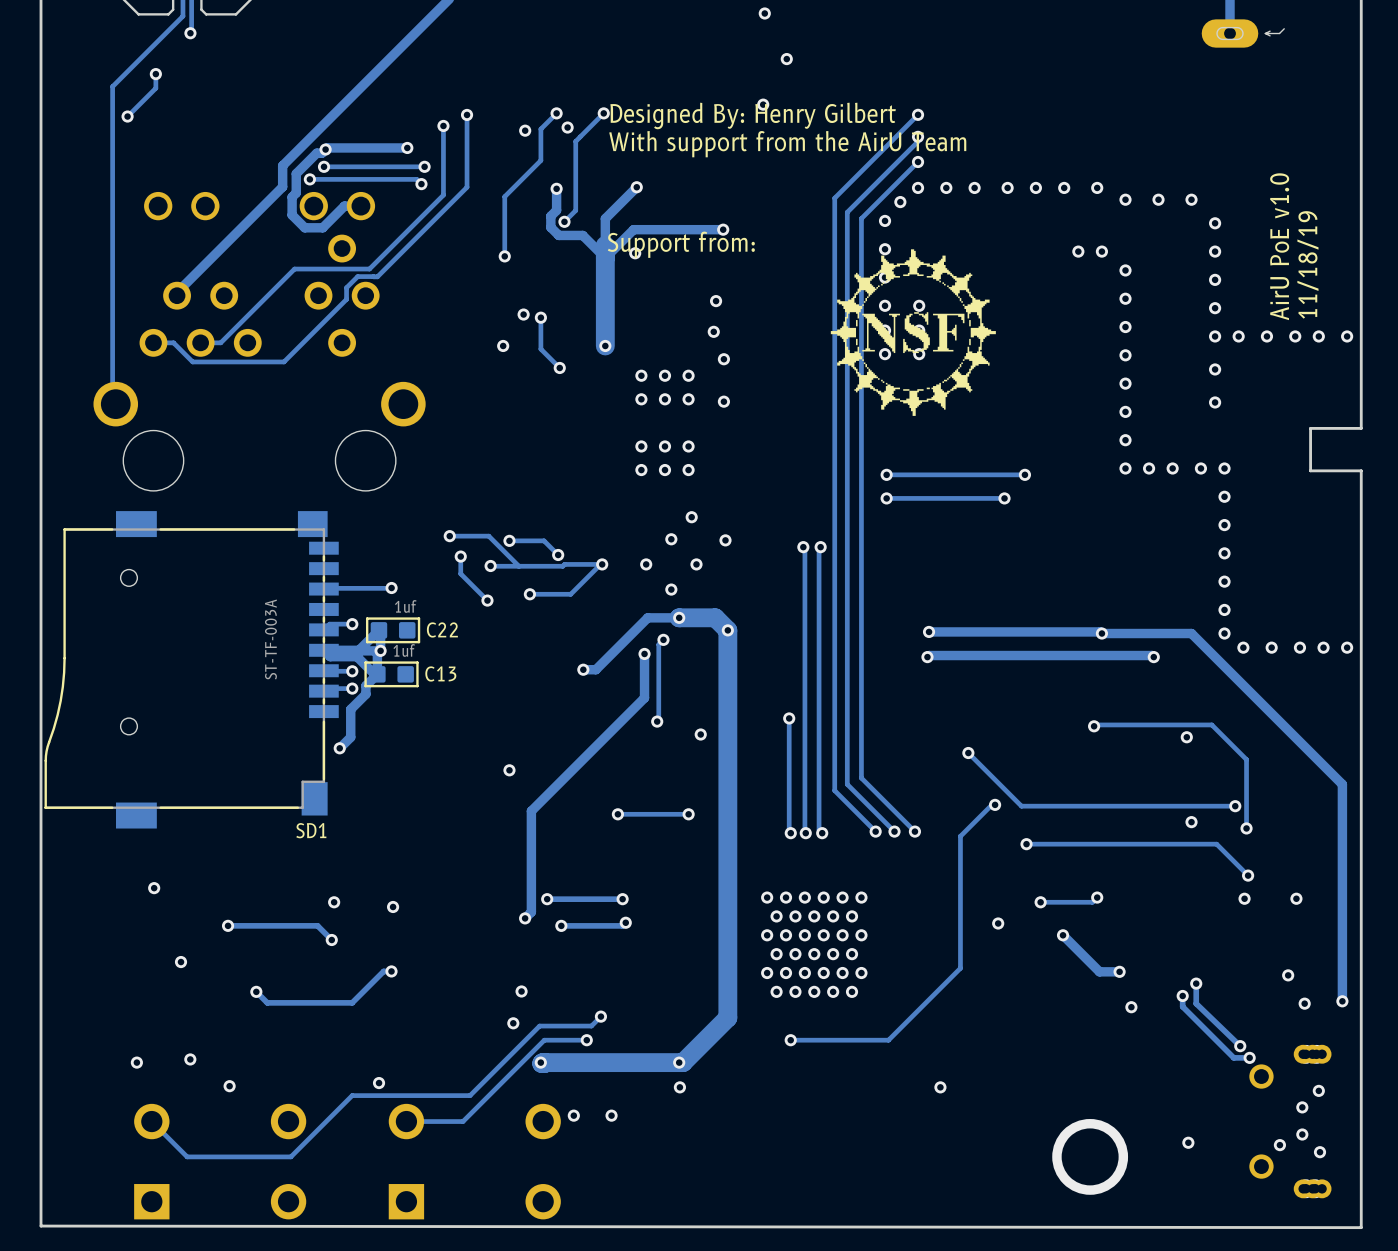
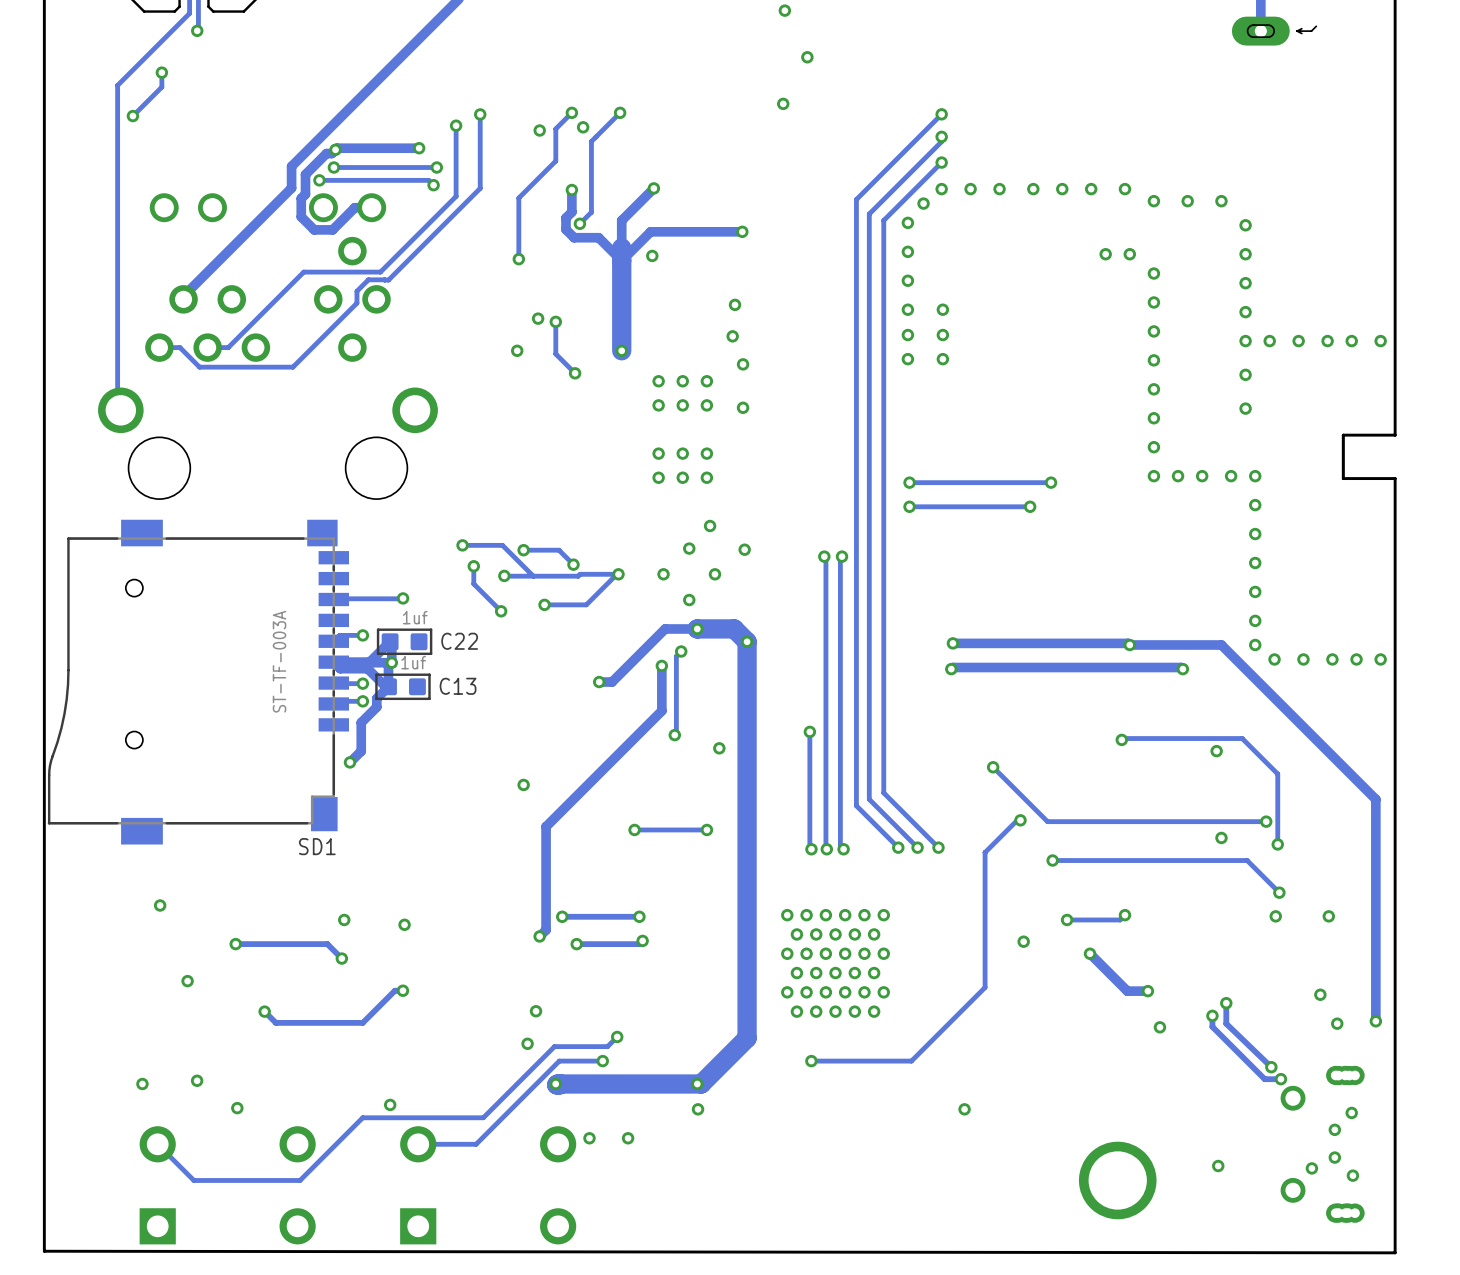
text: Designed By: Henry Gilbert (753, 115) -> none
text: With support from the AirU Team (787, 144) -> none
text: Support from: (681, 244) -> none
text: AirU PoE v1.0 (1279, 246) -> none
drawing: [830, 249, 996, 416] -> none
text: 11/18/19 (1307, 264) -> none

